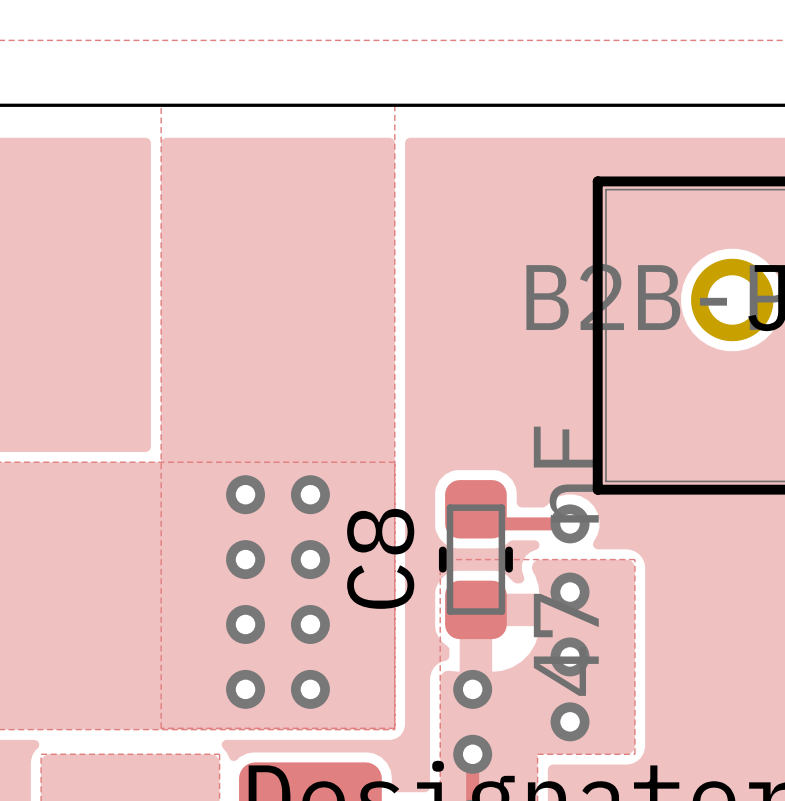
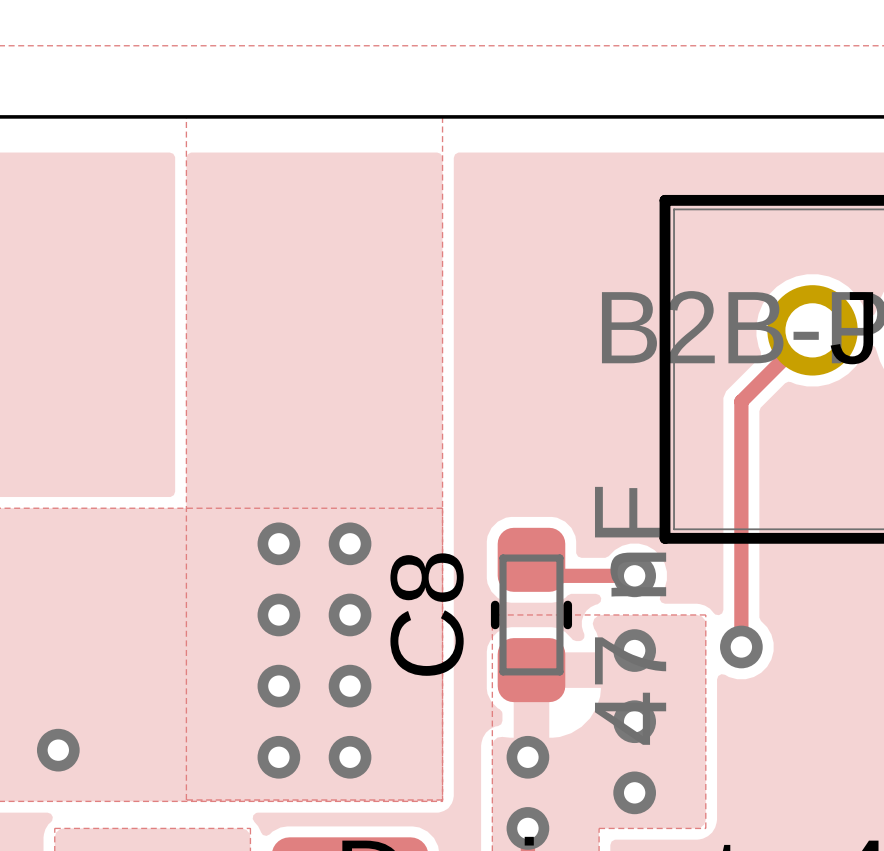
track: none -> (812, 330) (741, 401) (741, 646)
via: none -> (741, 646)
via: none -> (58, 750)

